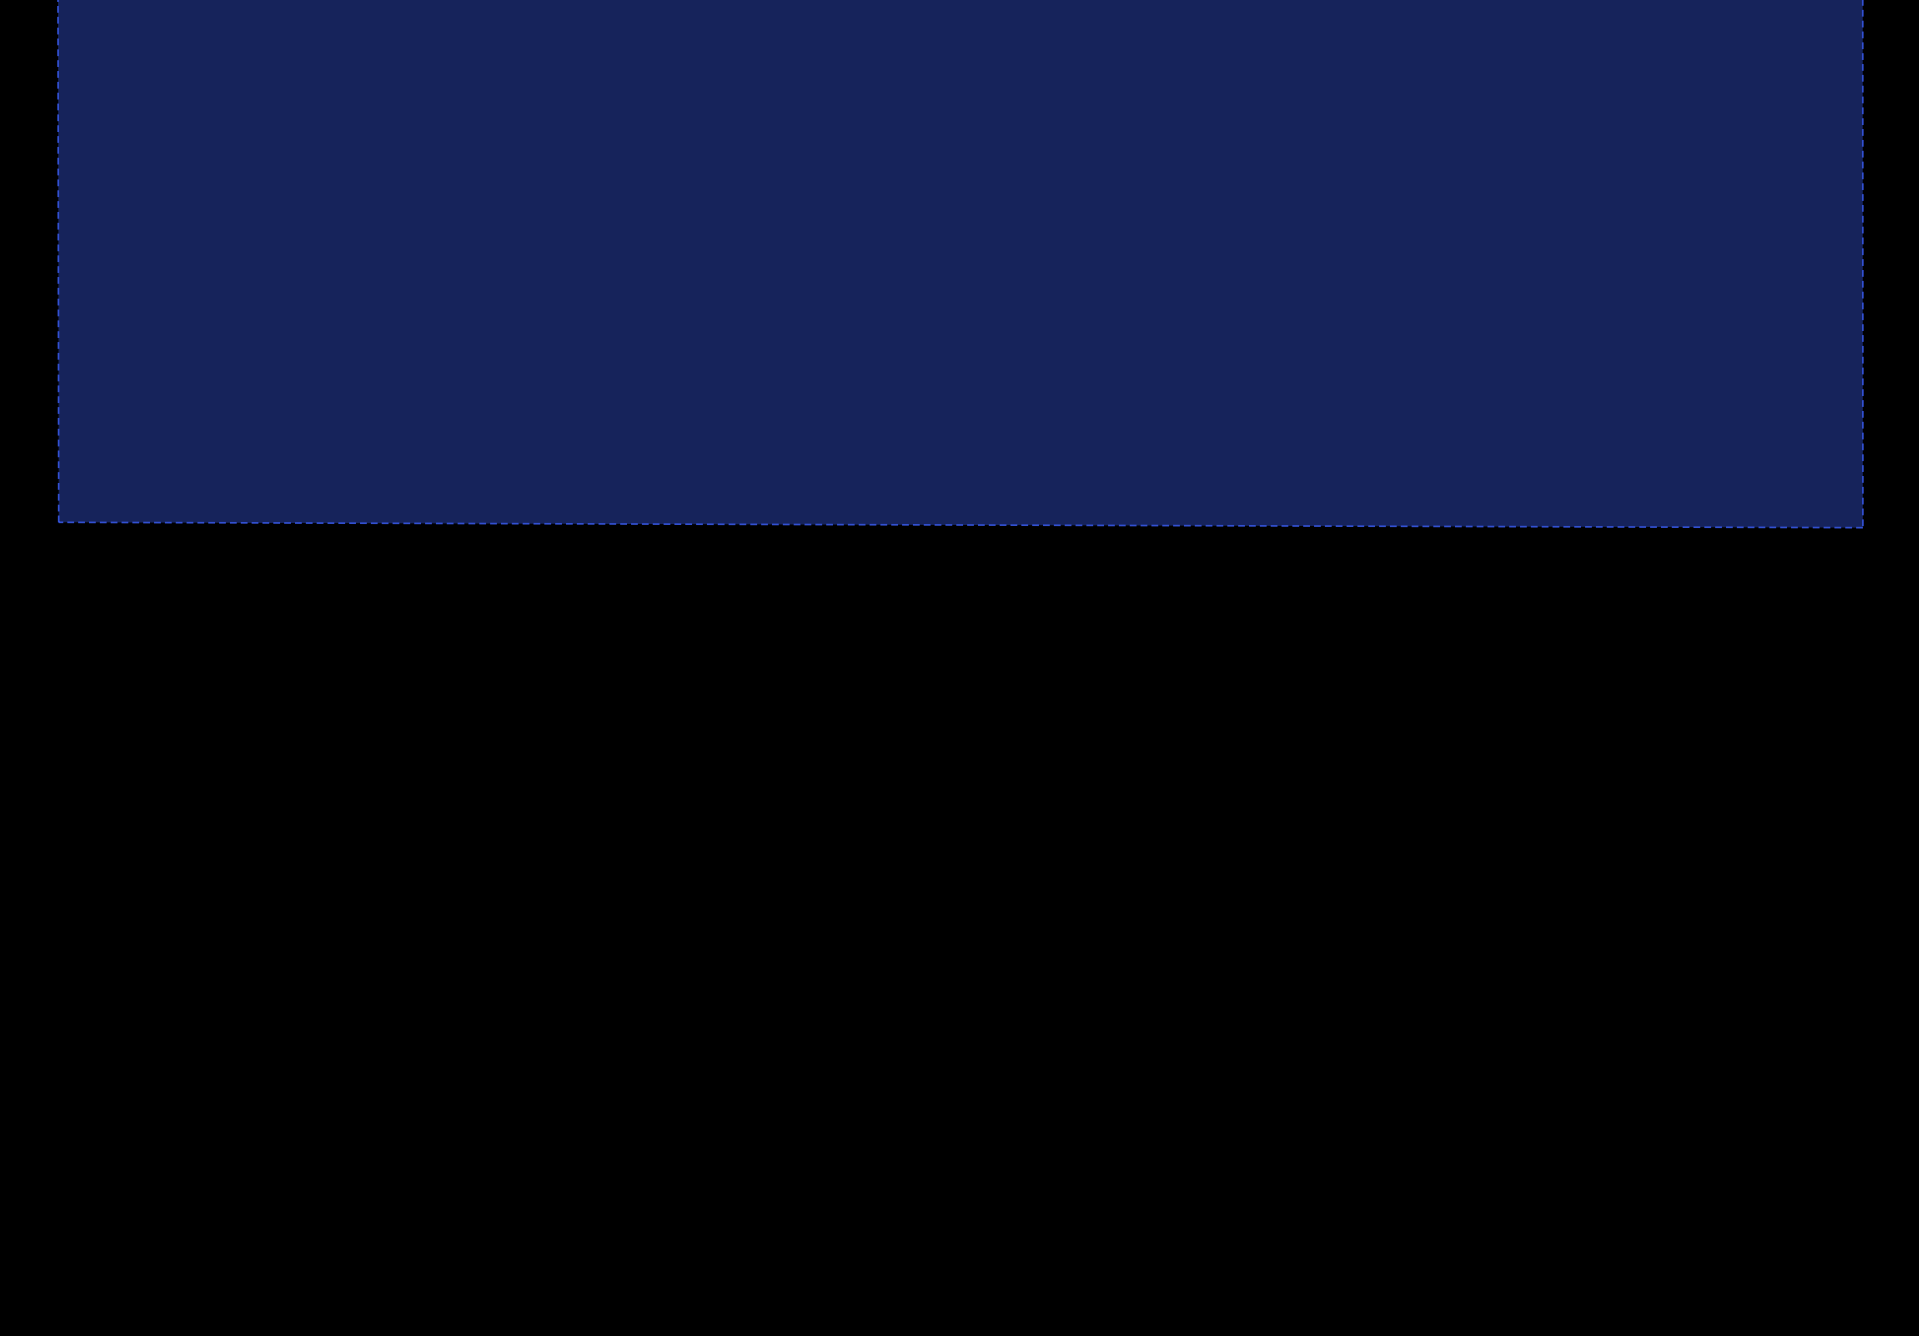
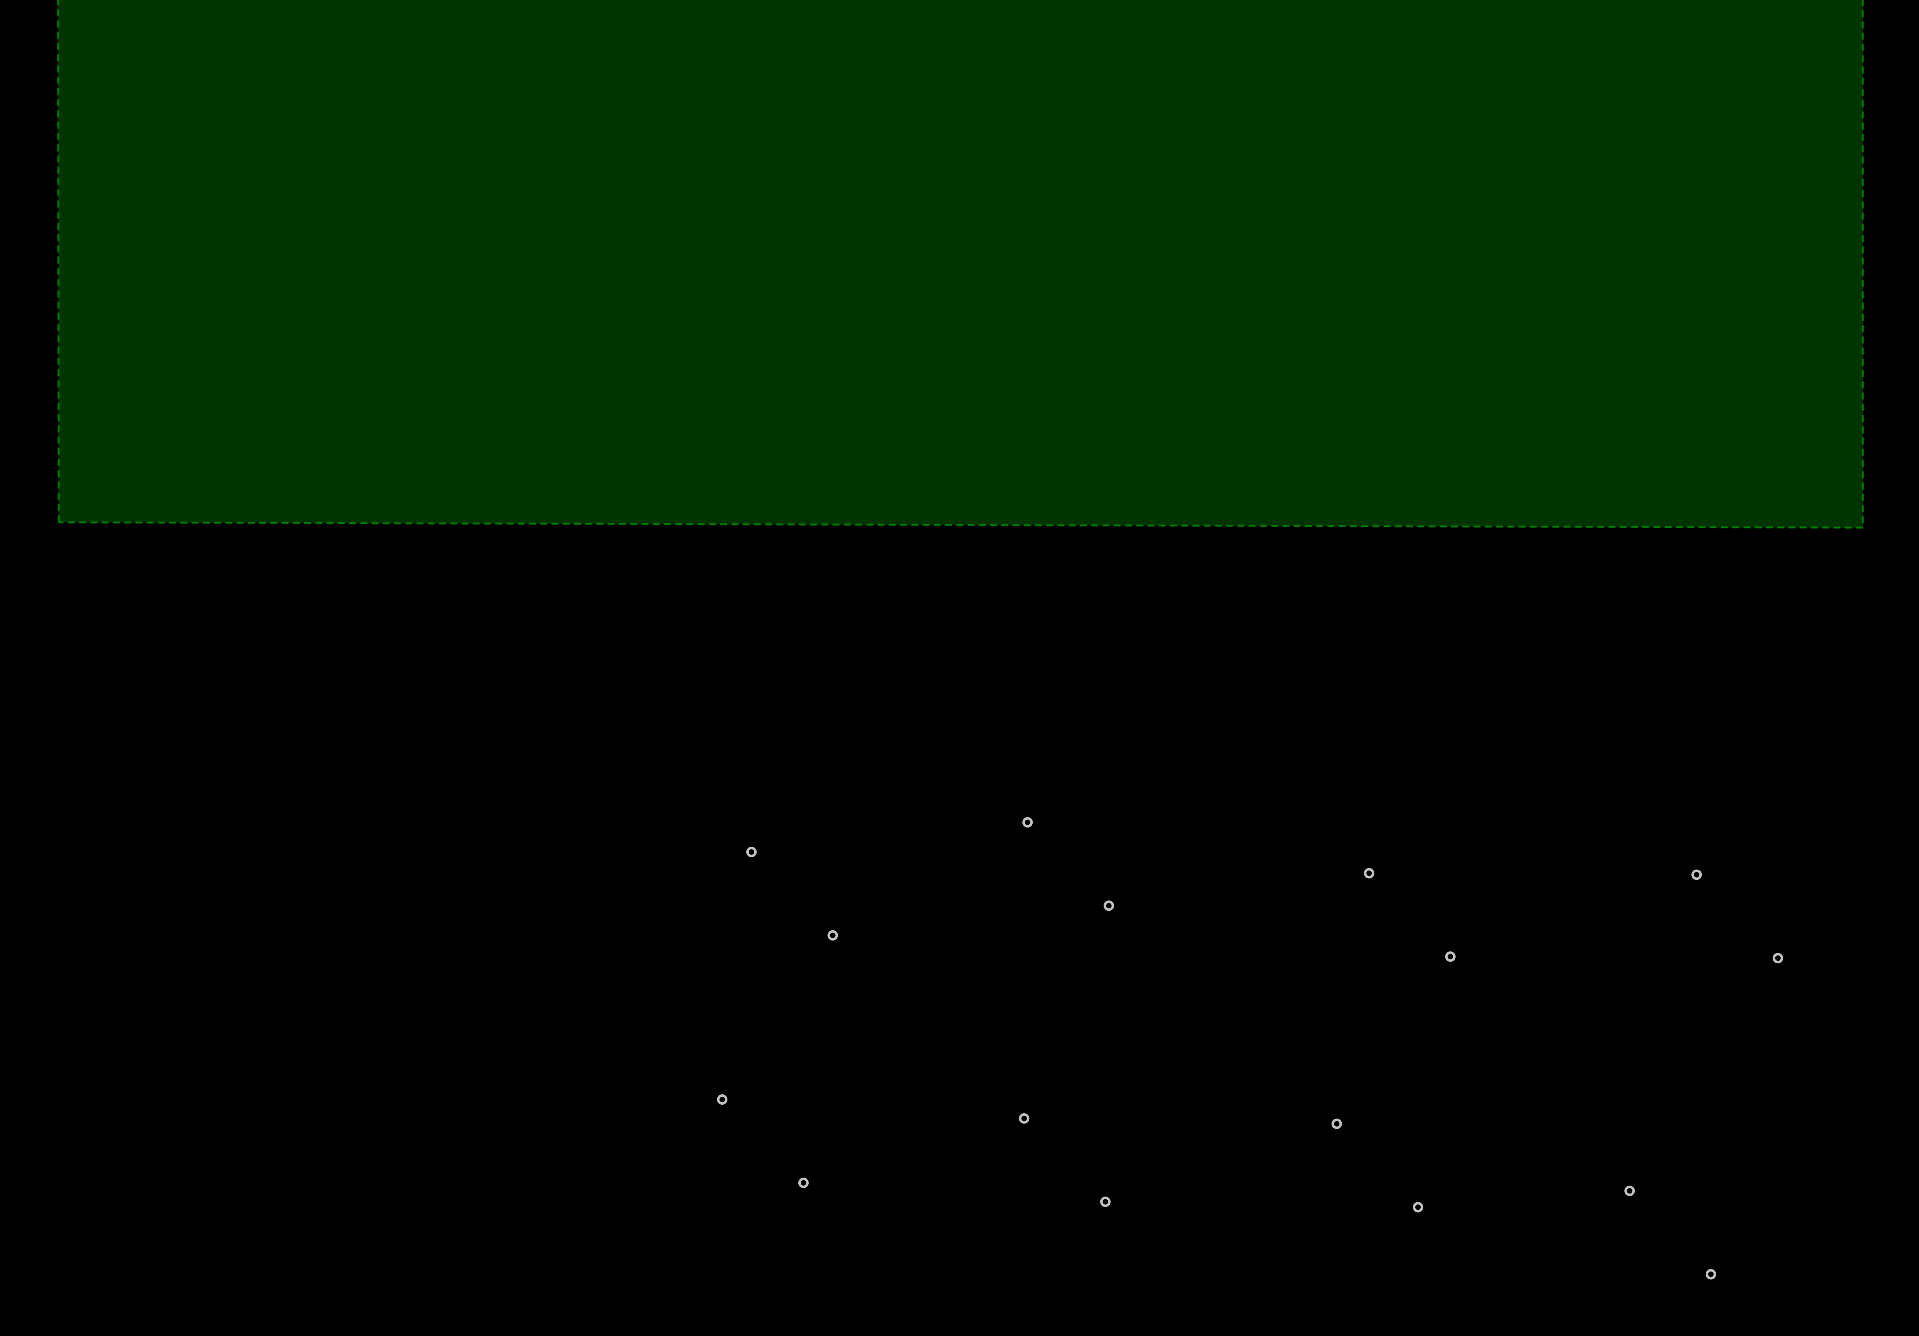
via: none -> (1027, 822)
via: none -> (751, 851)
via: none -> (1369, 873)
via: none -> (1696, 874)
via: none -> (1108, 905)
via: none -> (832, 935)
via: none -> (1450, 956)
via: none -> (1777, 958)
via: none -> (722, 1099)
via: none -> (1024, 1118)
via: none -> (1336, 1123)
via: none -> (803, 1182)
via: none -> (1629, 1190)
via: none -> (1105, 1201)
via: none -> (1418, 1207)
via: none -> (1710, 1274)

